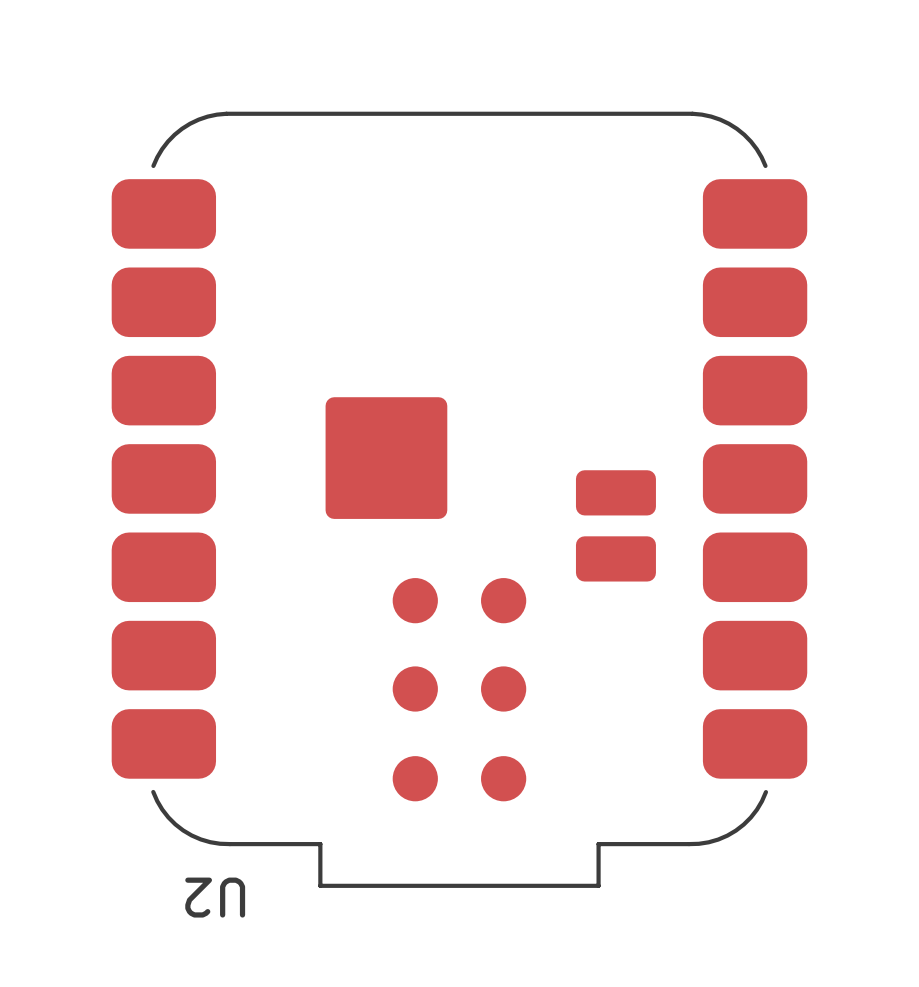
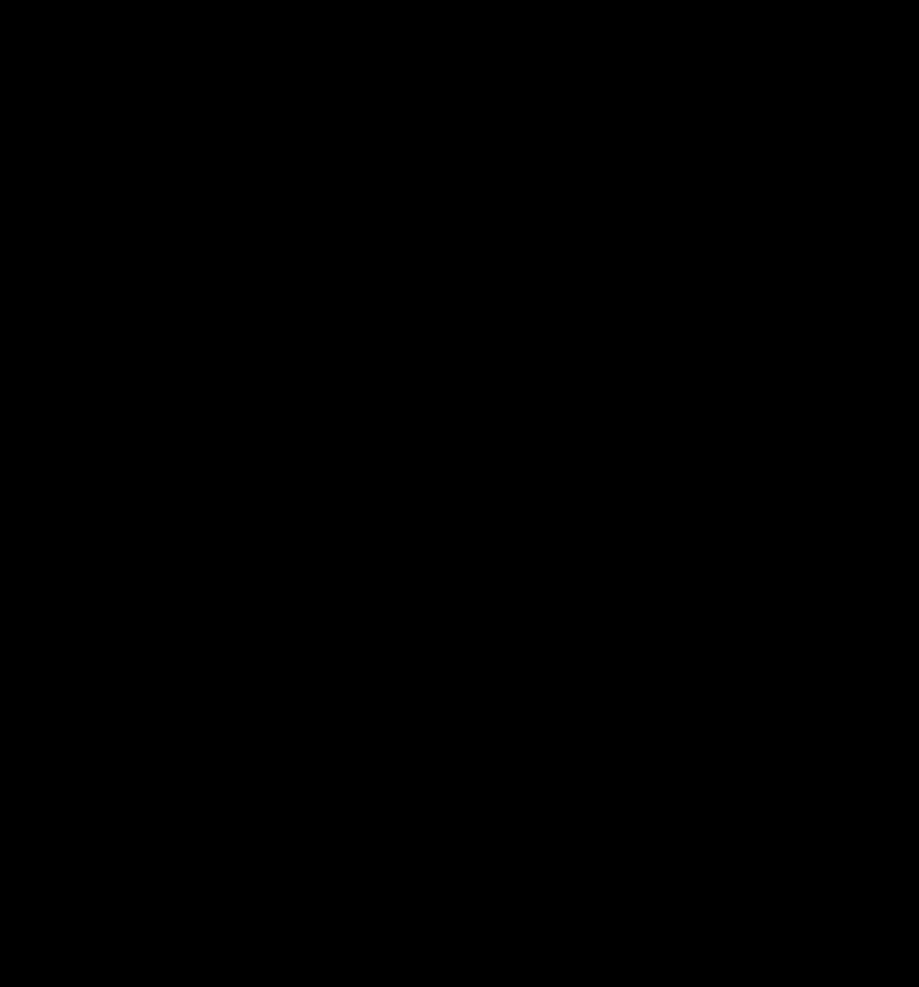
U2: (459, 499) -> none

